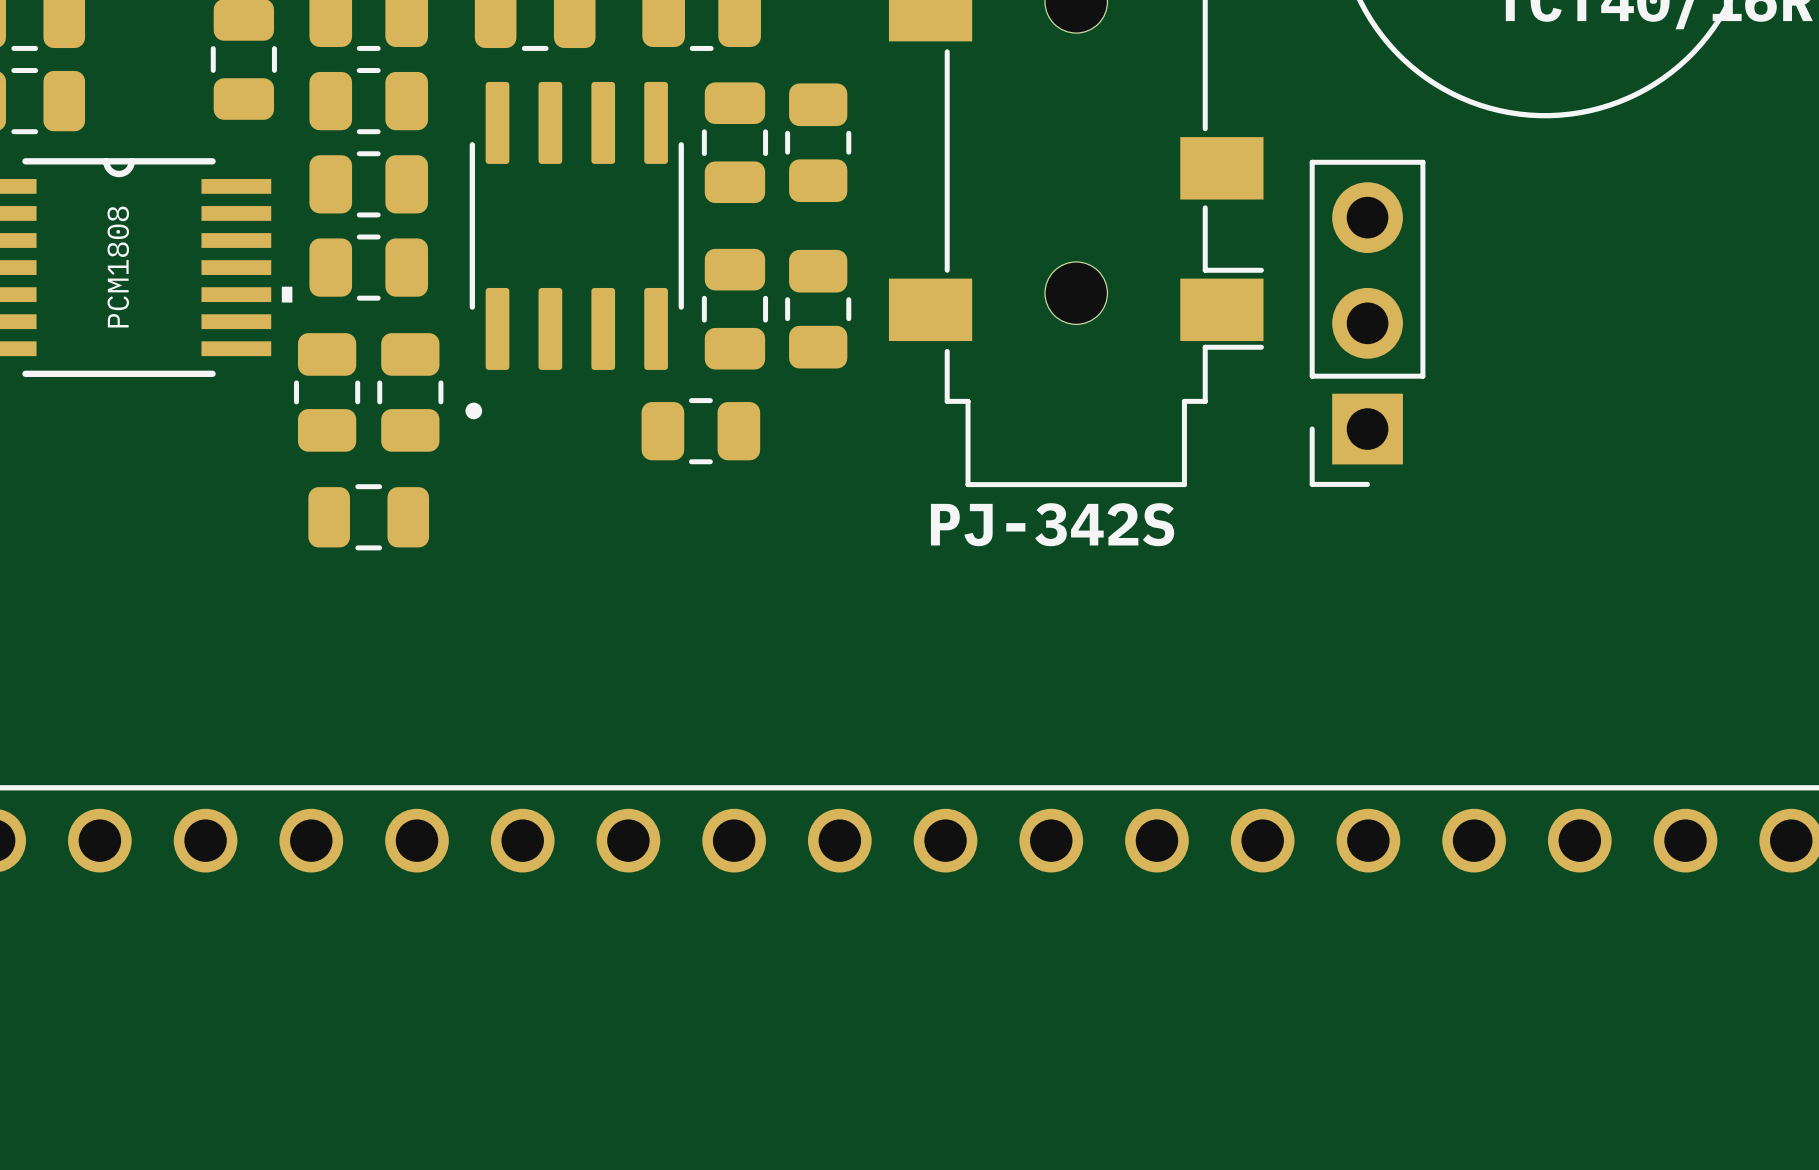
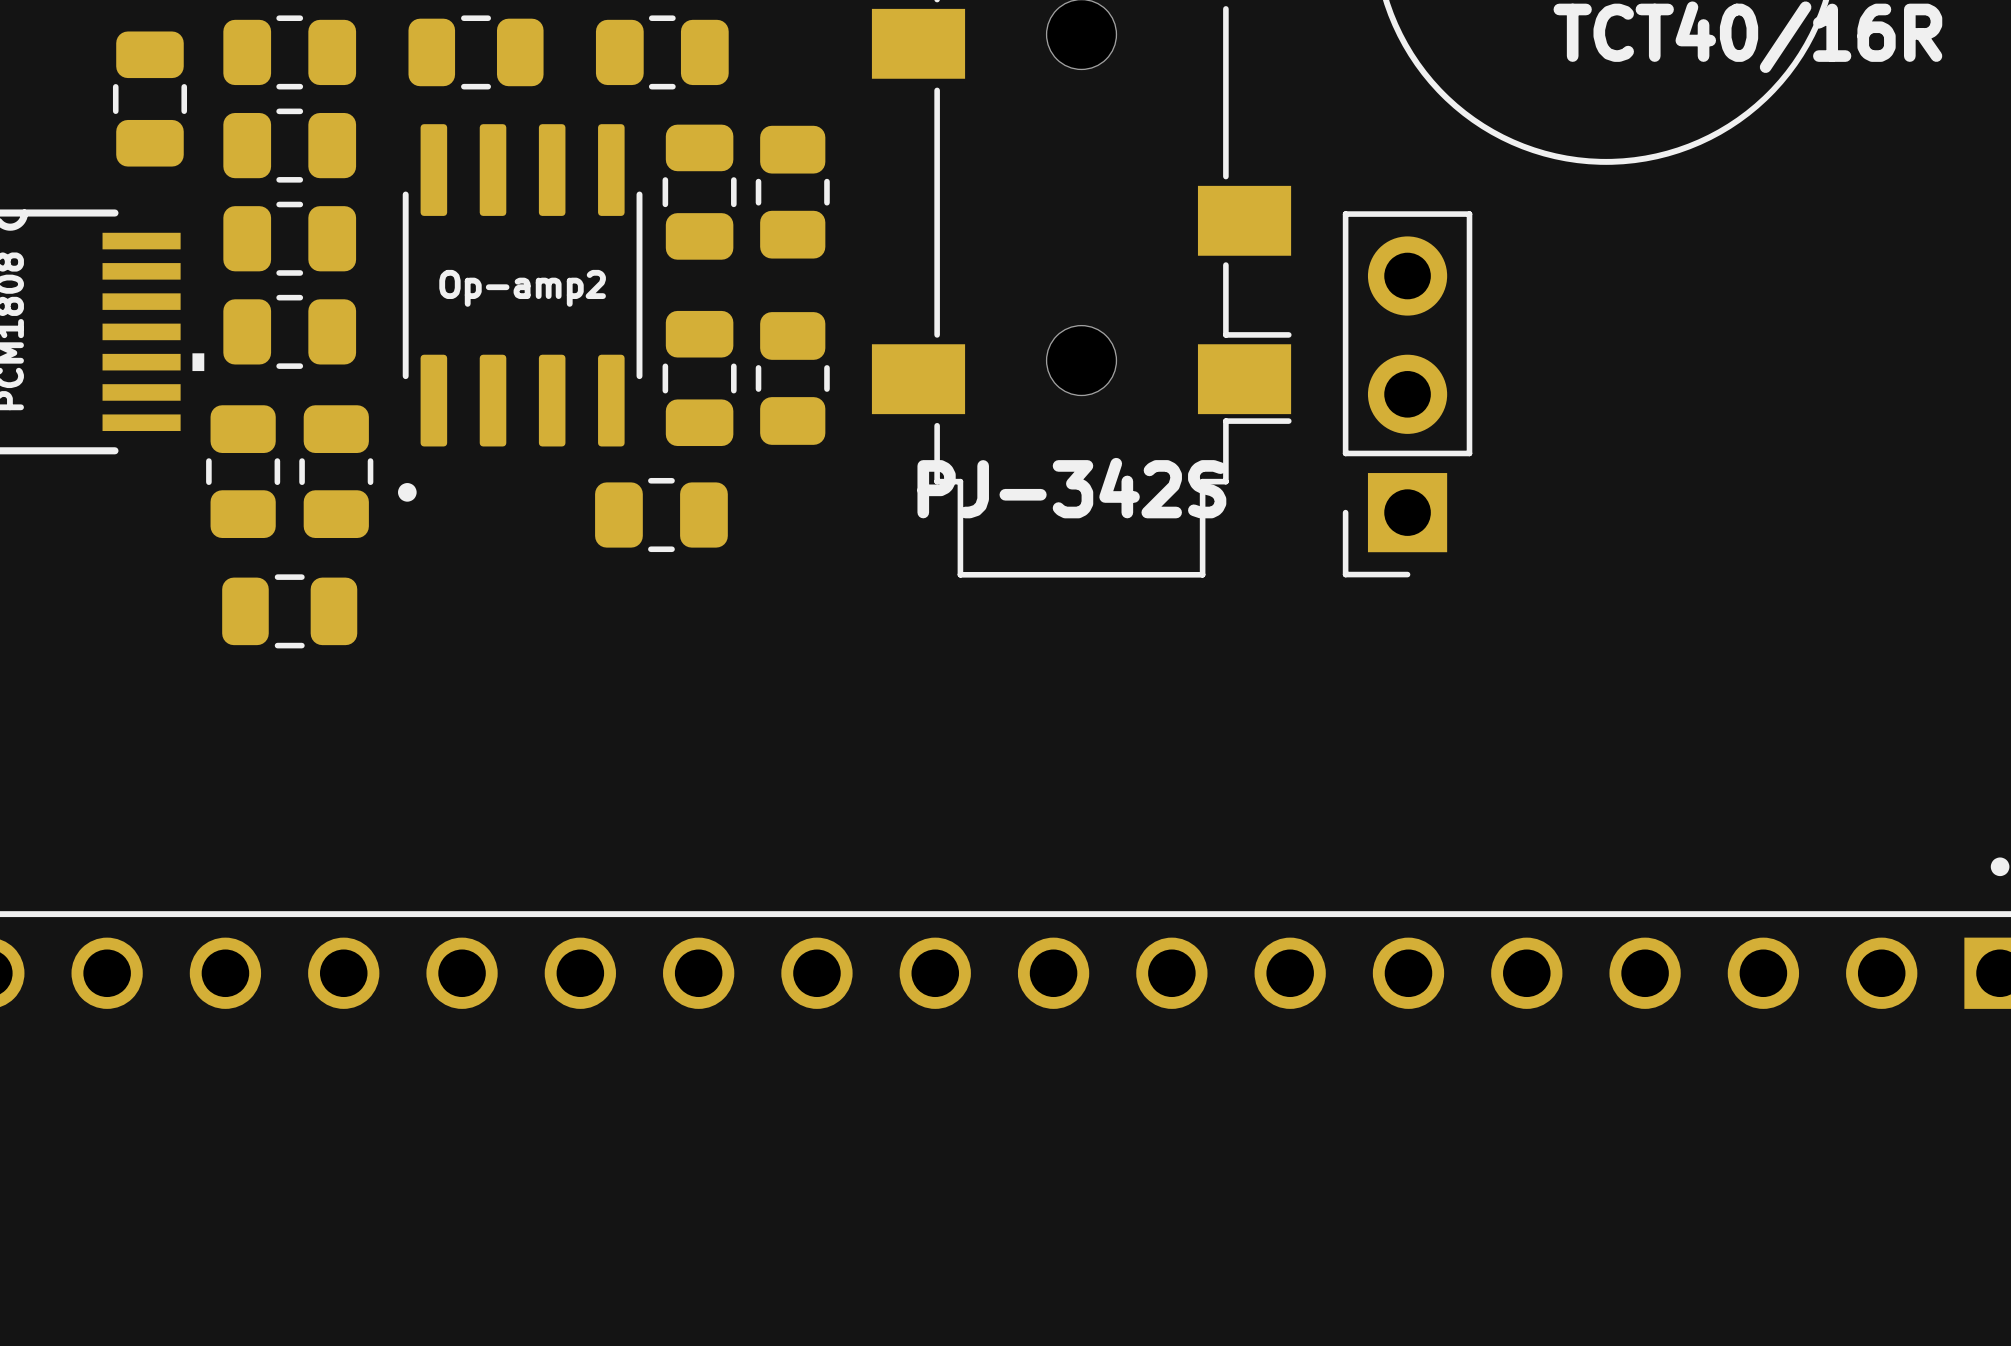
Op-amp2 name: none -> Op-amp2 (522, 288)
text position: PJ-342S (1052, 524) -> PJ-342S (1071, 488)

